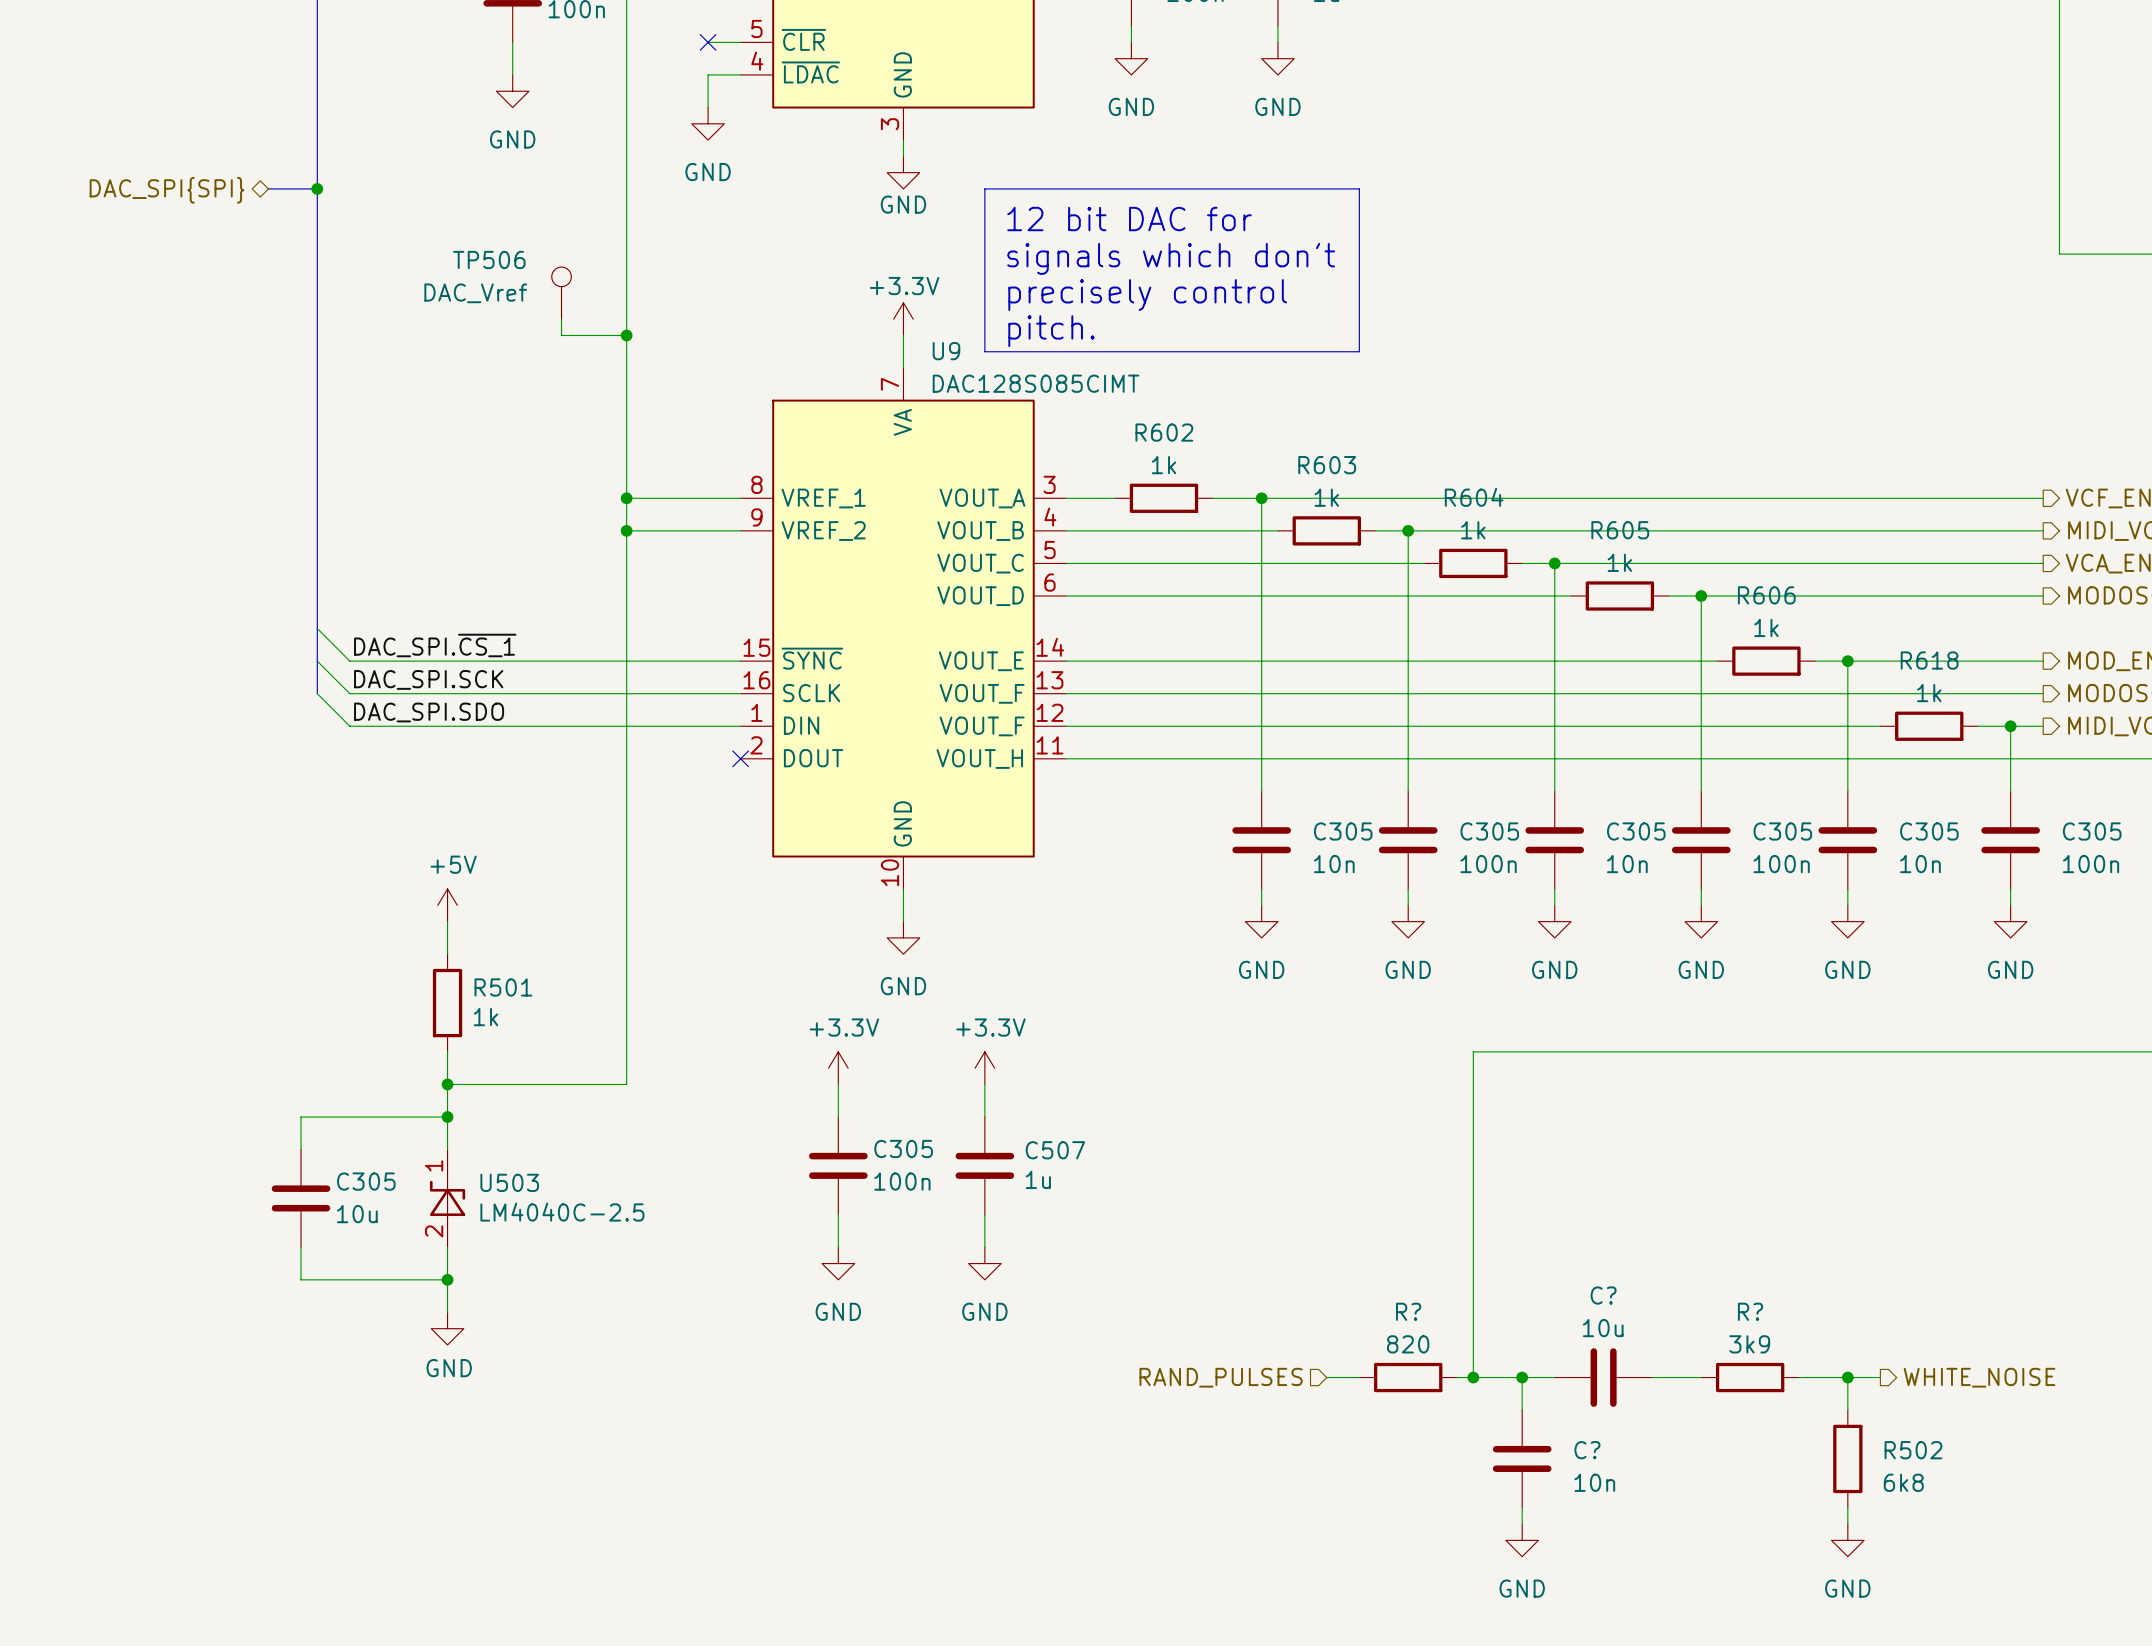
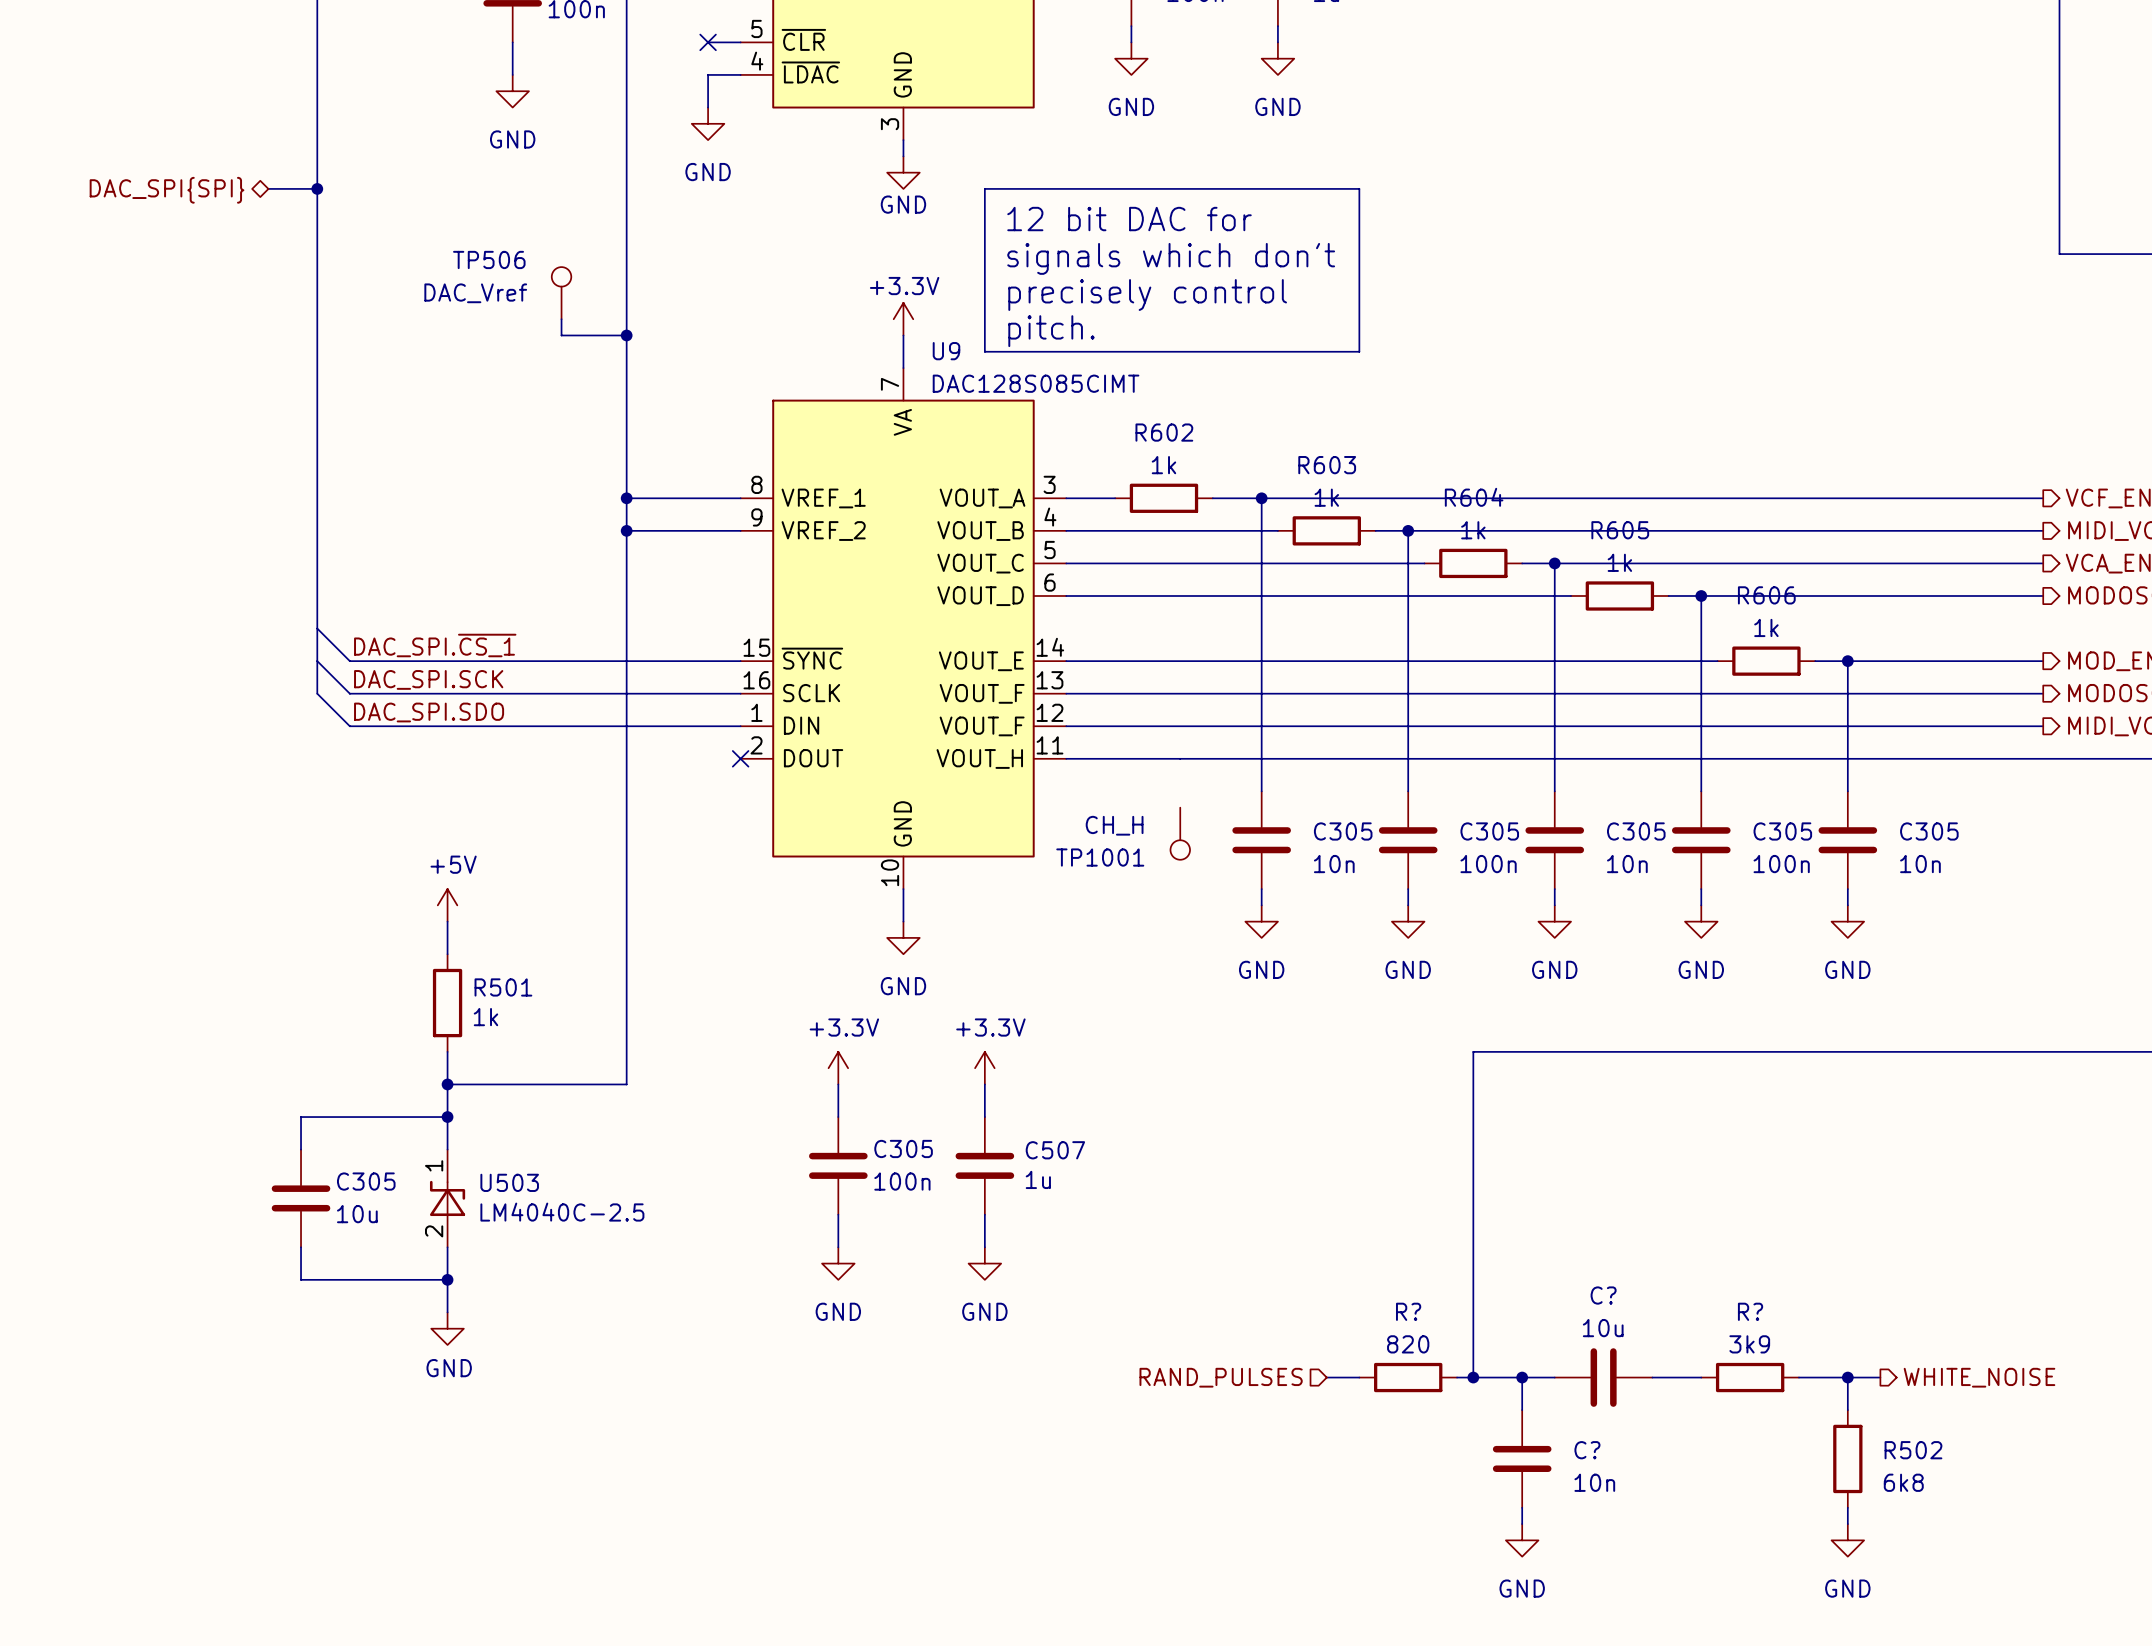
wire: none -> (1880, 726) (1978, 726)
R618: 1k (1929, 726) -> none
wire: (2010, 726) (2010, 791) -> none
junction: (2010, 726) -> none
TP1001: none -> CH_H (1180, 833)
C305: 100n (2010, 840) -> none
wire: (2010, 889) (2010, 905) -> none
power symbol: GND (2010, 921) -> none

